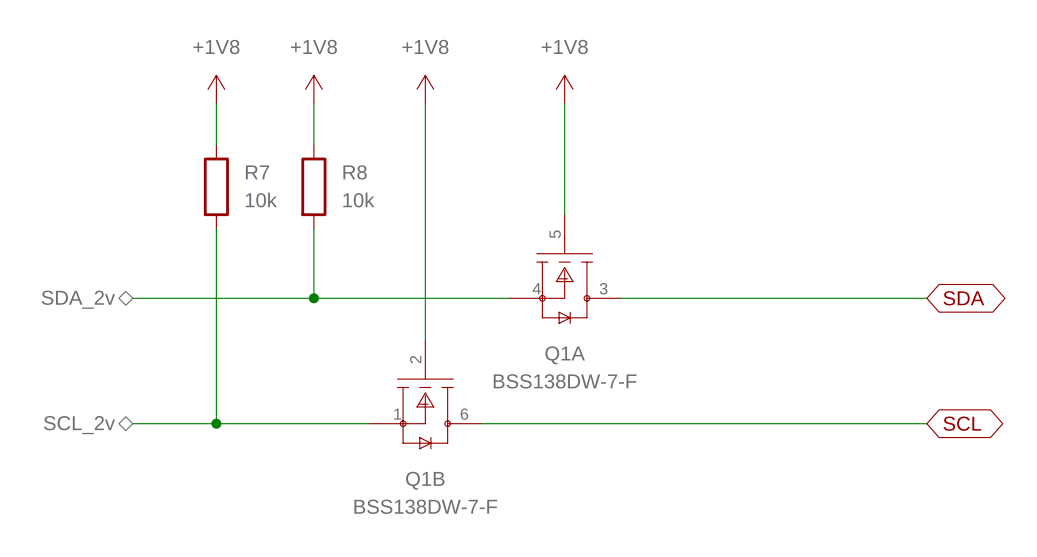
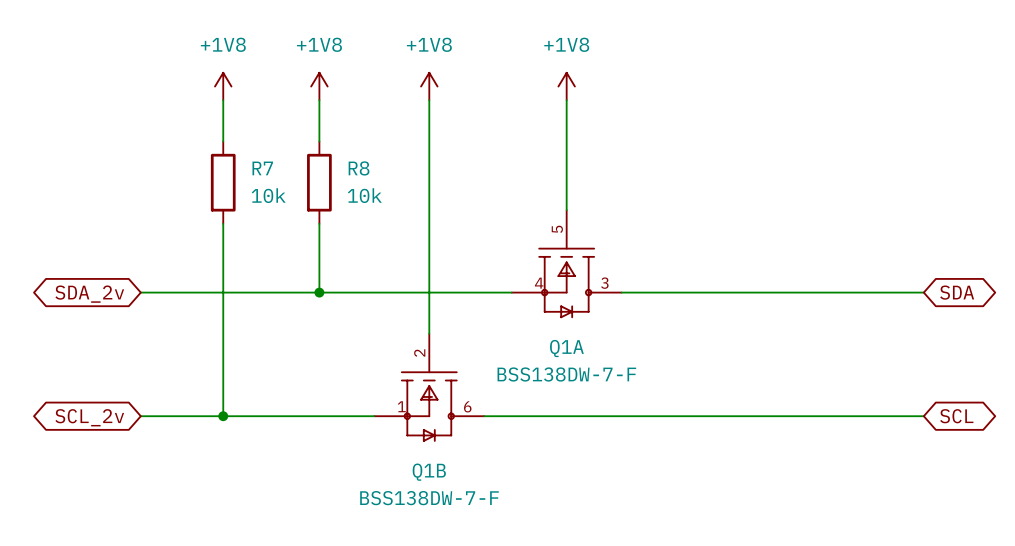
hierarchical label: SDA_2v (78, 299) -> none
global label: none -> SDA_2v (89, 294)
hierarchical label: SCL_2v (79, 425) -> none
global label: none -> SCL_2v (89, 417)

